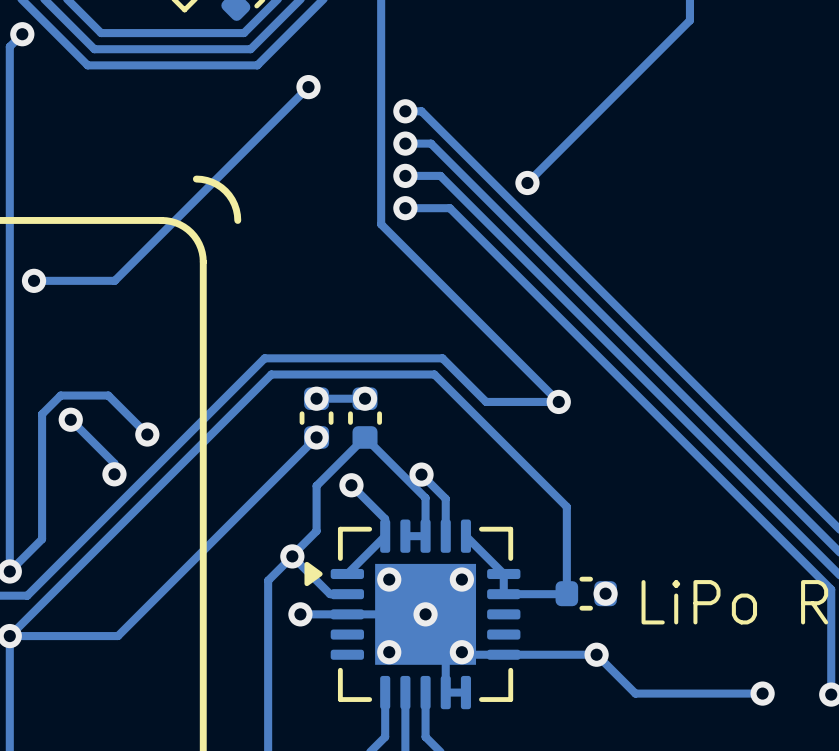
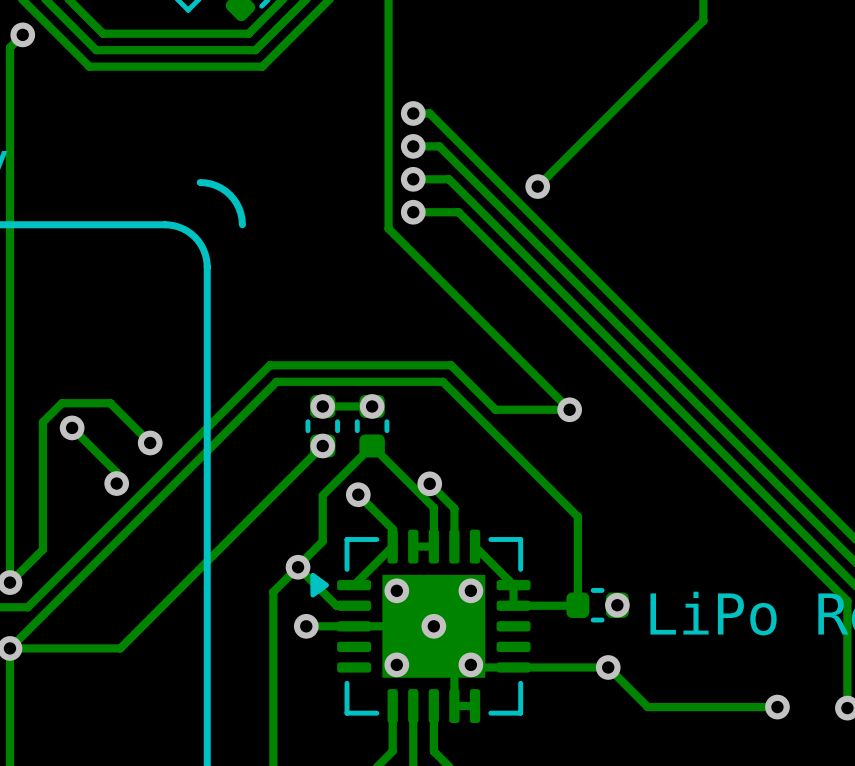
track: (308, 87) (114, 280) (34, 280) -> none
via: (308, 87) -> none
via: (34, 280) -> none

